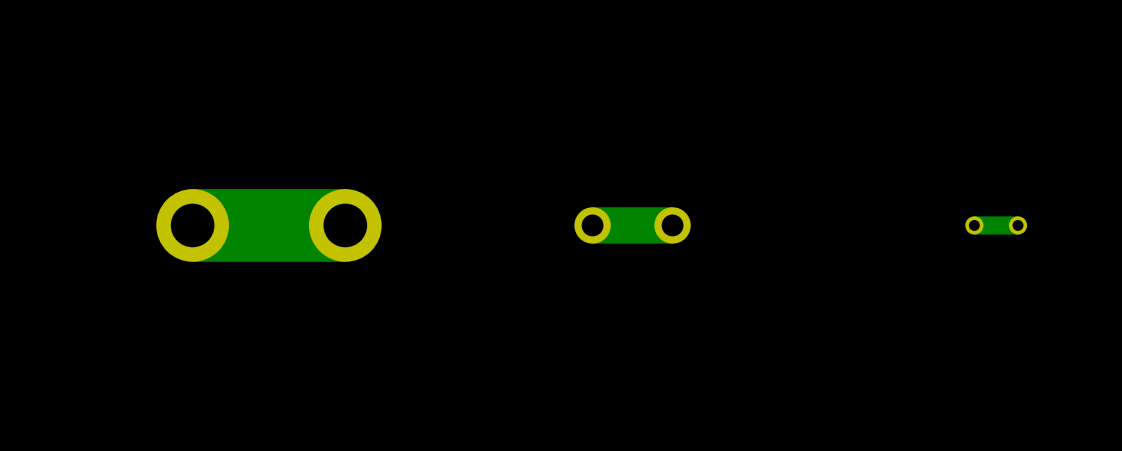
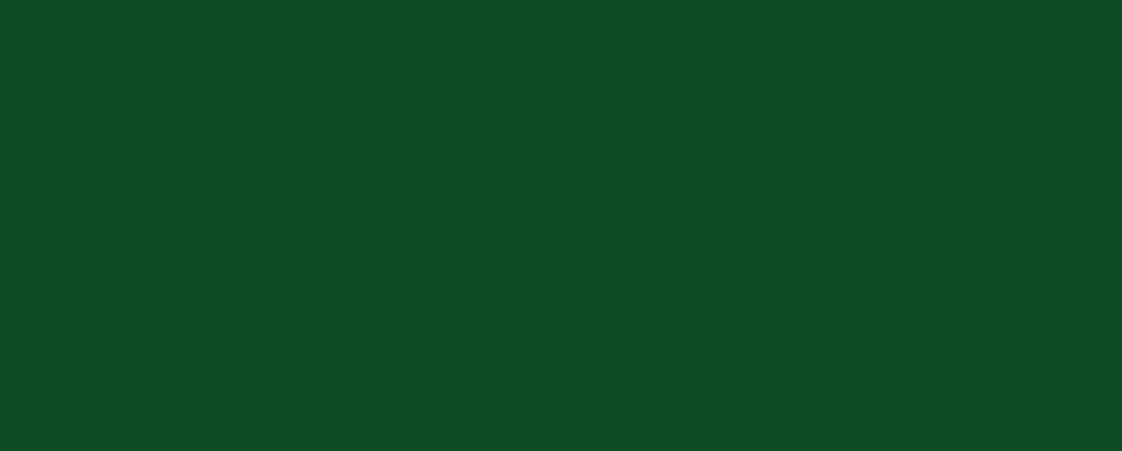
part: (268, 225) -> none
part: (632, 225) -> none
part: (996, 225) -> none

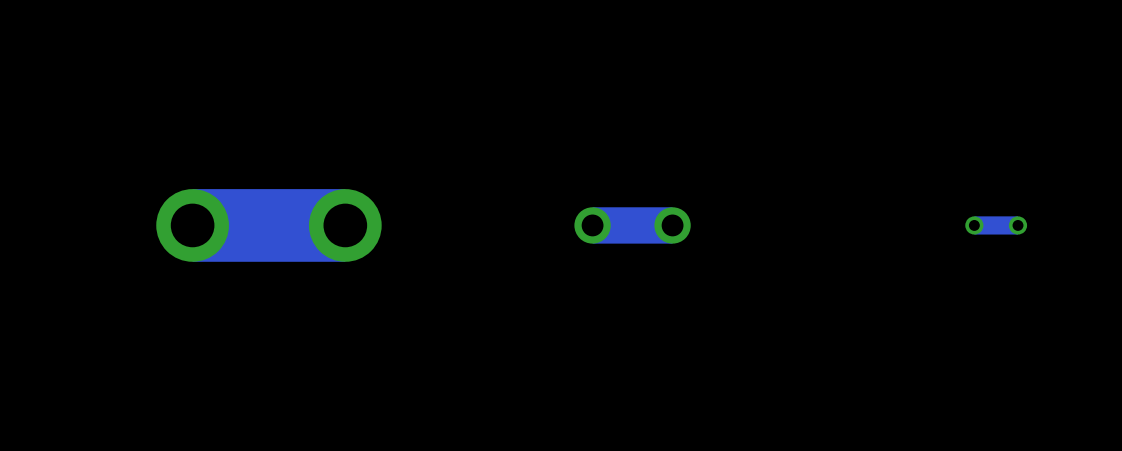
part: none -> (268, 225)
part: none -> (632, 225)
part: none -> (996, 225)

